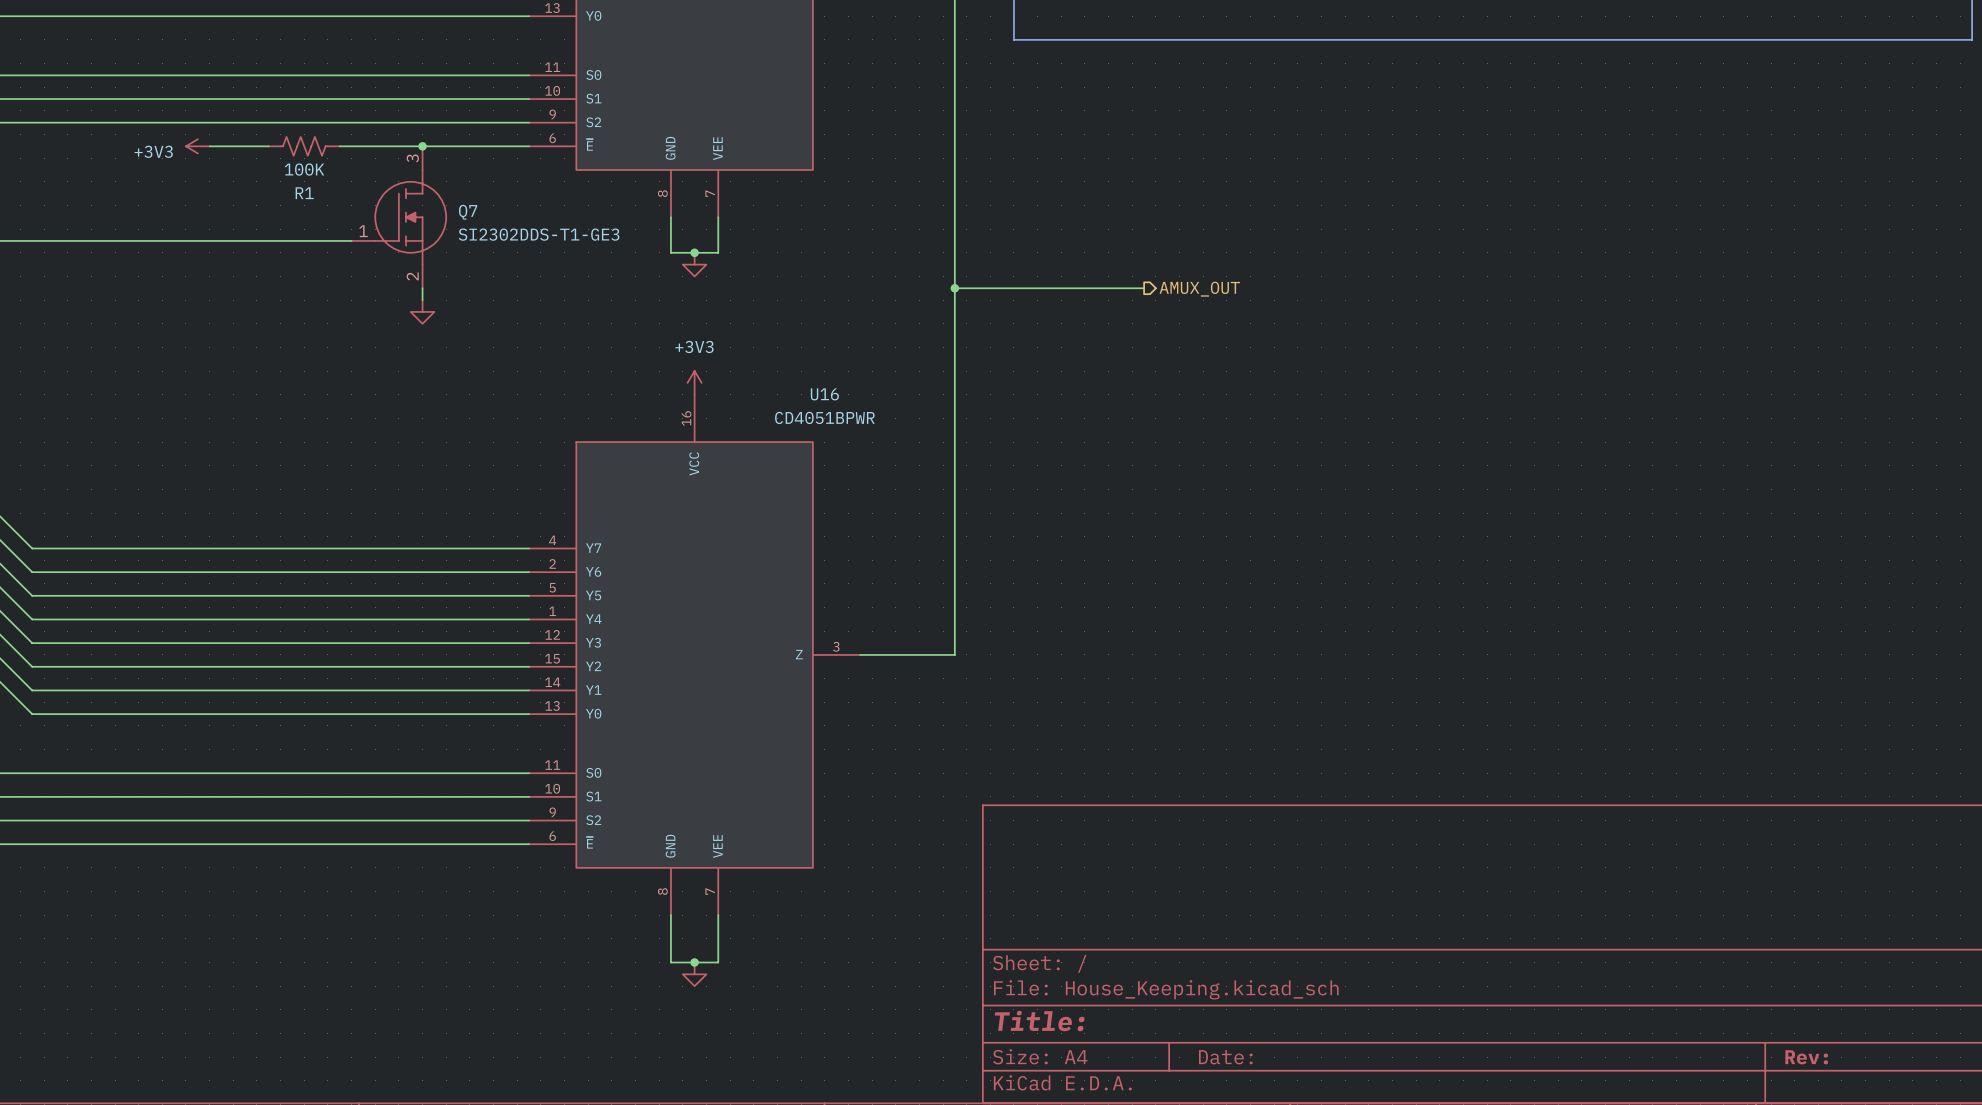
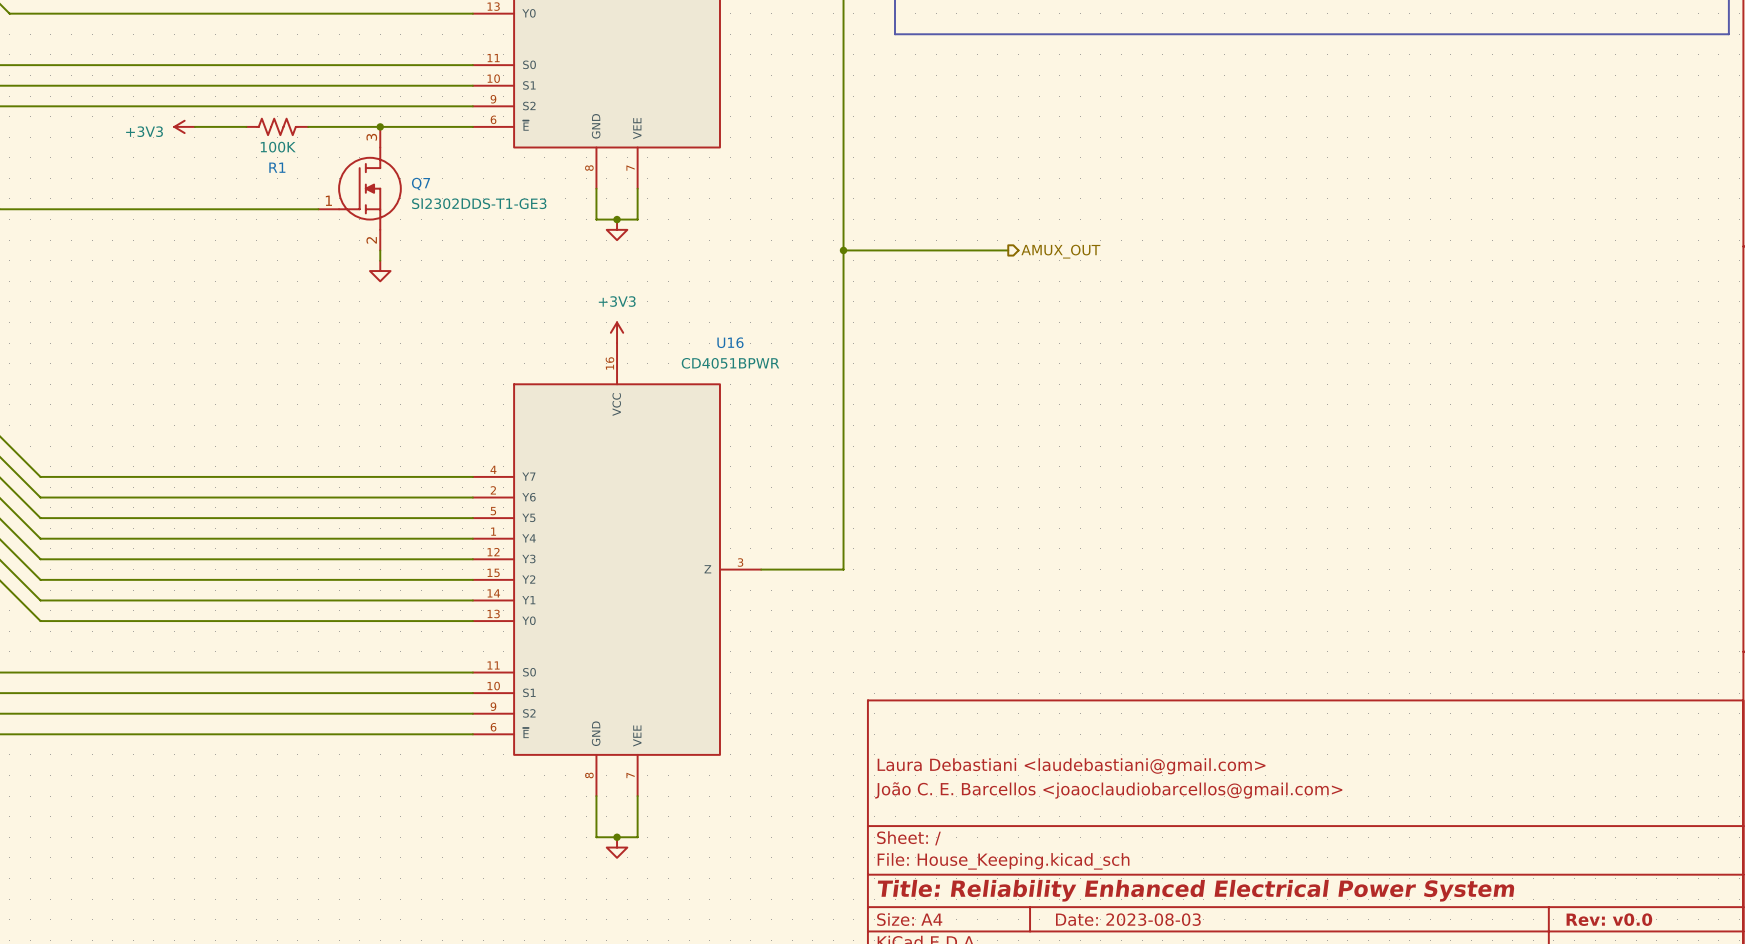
title block: none -> Laura Debastiani <laudebastiani@gmail.com> (1071, 766)
title block: none -> João C. E. Barcellos <joaoclaudiobarcellos@gmail.com> (1108, 790)
title block: Title: (1039, 1021) -> Title: Reliability Enhanced Electrical Power System (1196, 890)
title block: Date: (1225, 1057) -> Date: 2023-08-03 (1128, 919)
title block: Rev: (1806, 1057) -> Rev: v0.0 (1609, 919)

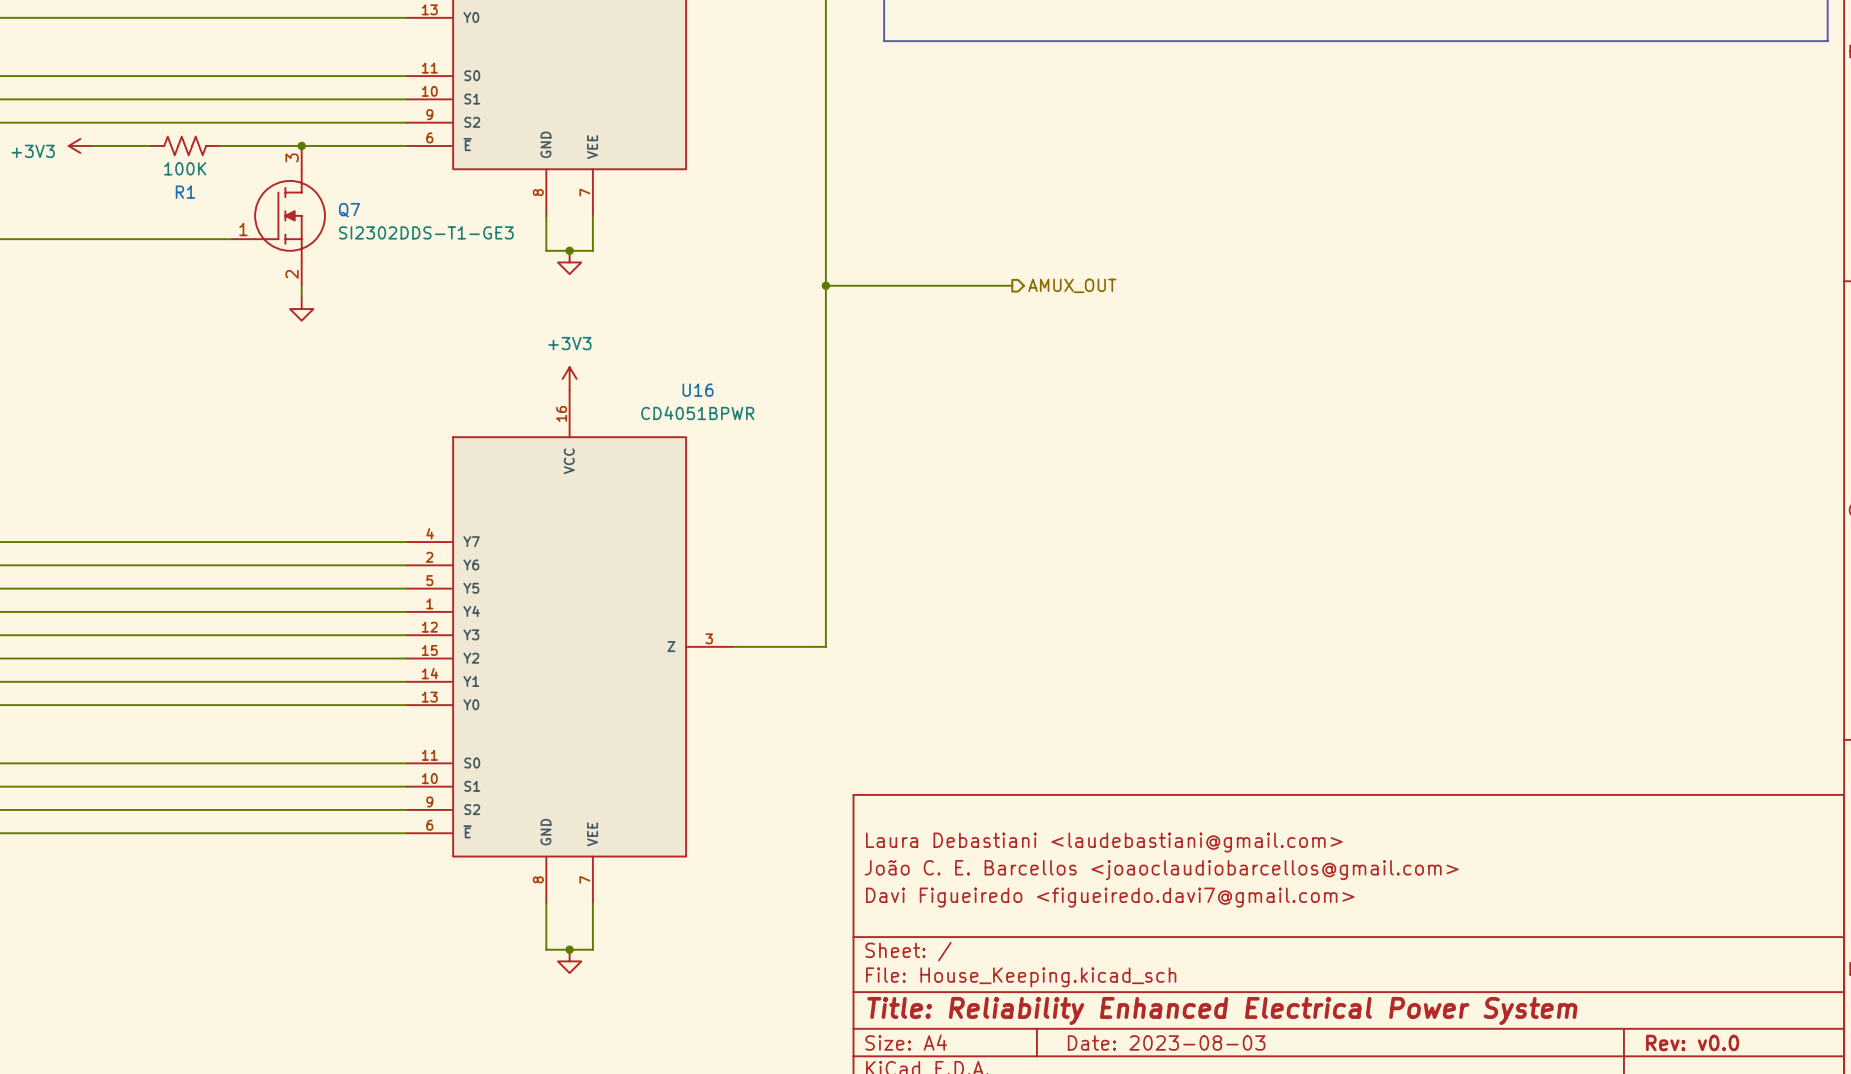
title block: none -> Laura Debastiani <laudebastiani@gmail.com> (1104, 842)
title block: Laura Debastiani <laudebastiani@gmail.com> (1071, 766) -> João C. E. Barcellos <joaoclaudiobarcellos@gmail.com> (1161, 870)
title block: João C. E. Barcellos <joaoclaudiobarcellos@gmail.com> (1108, 790) -> Davi Figueiredo <figueiredo.davi7@gmail.com> (1110, 897)

